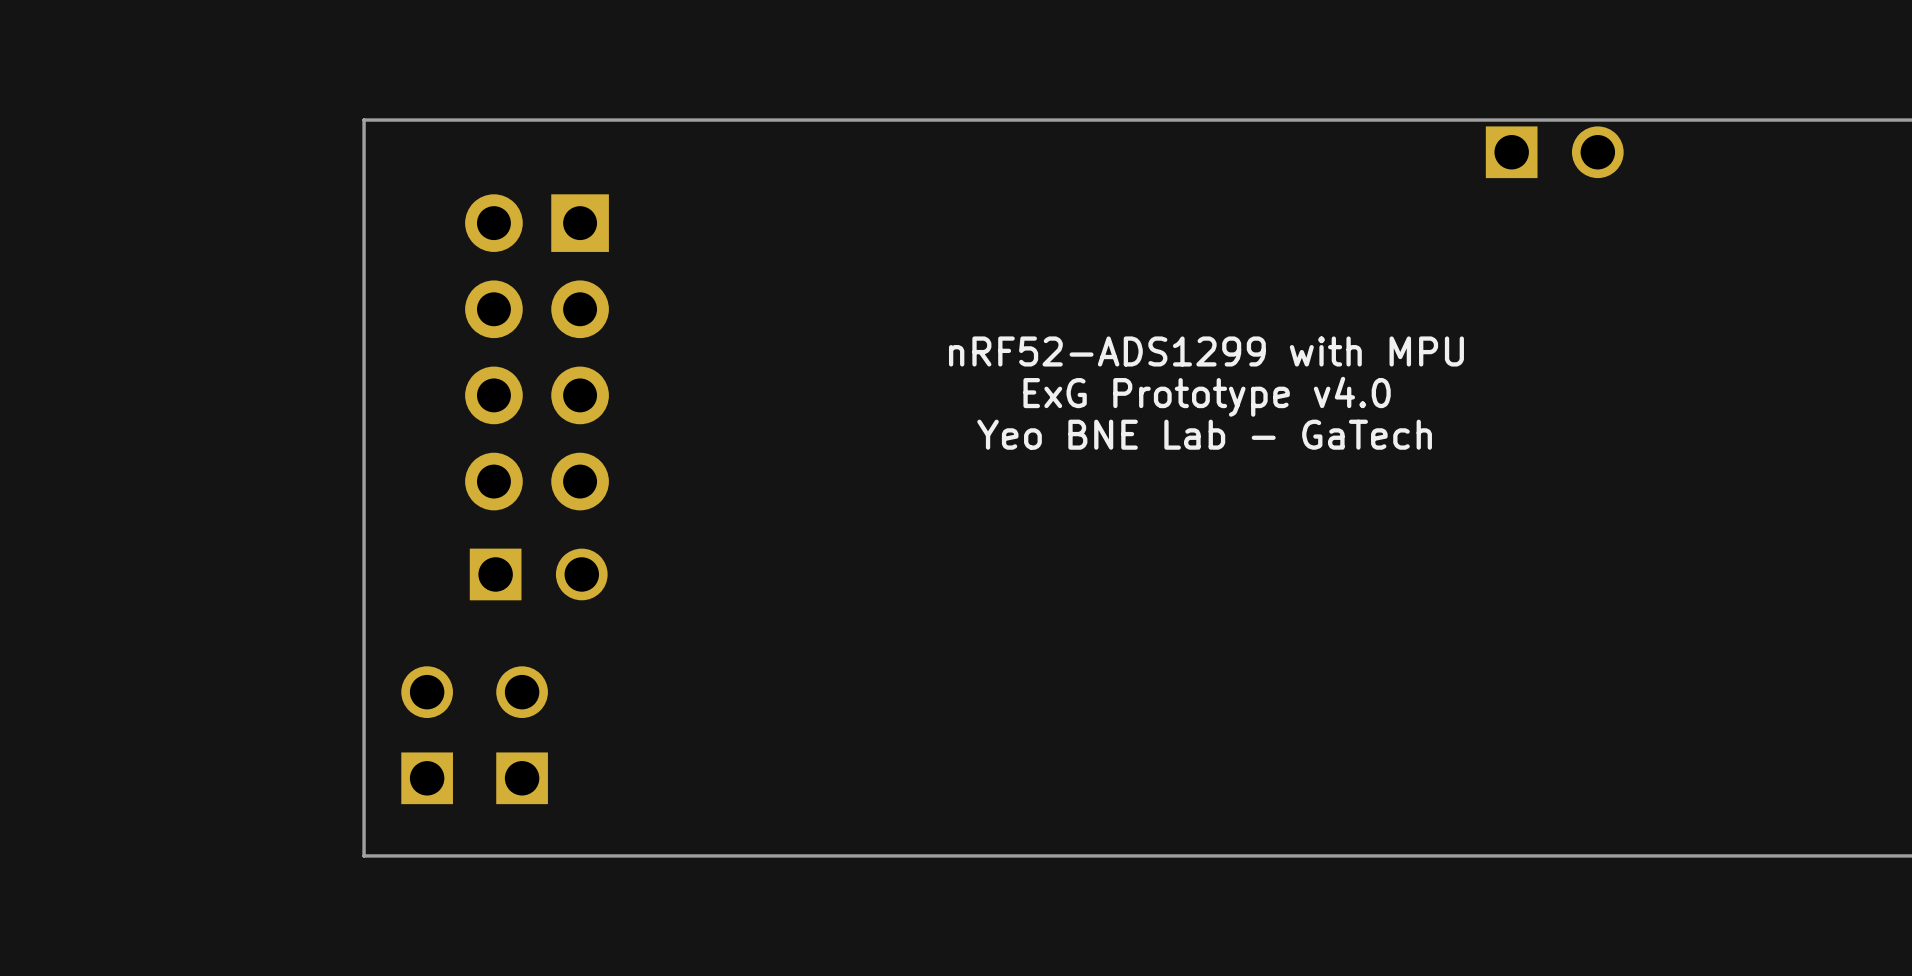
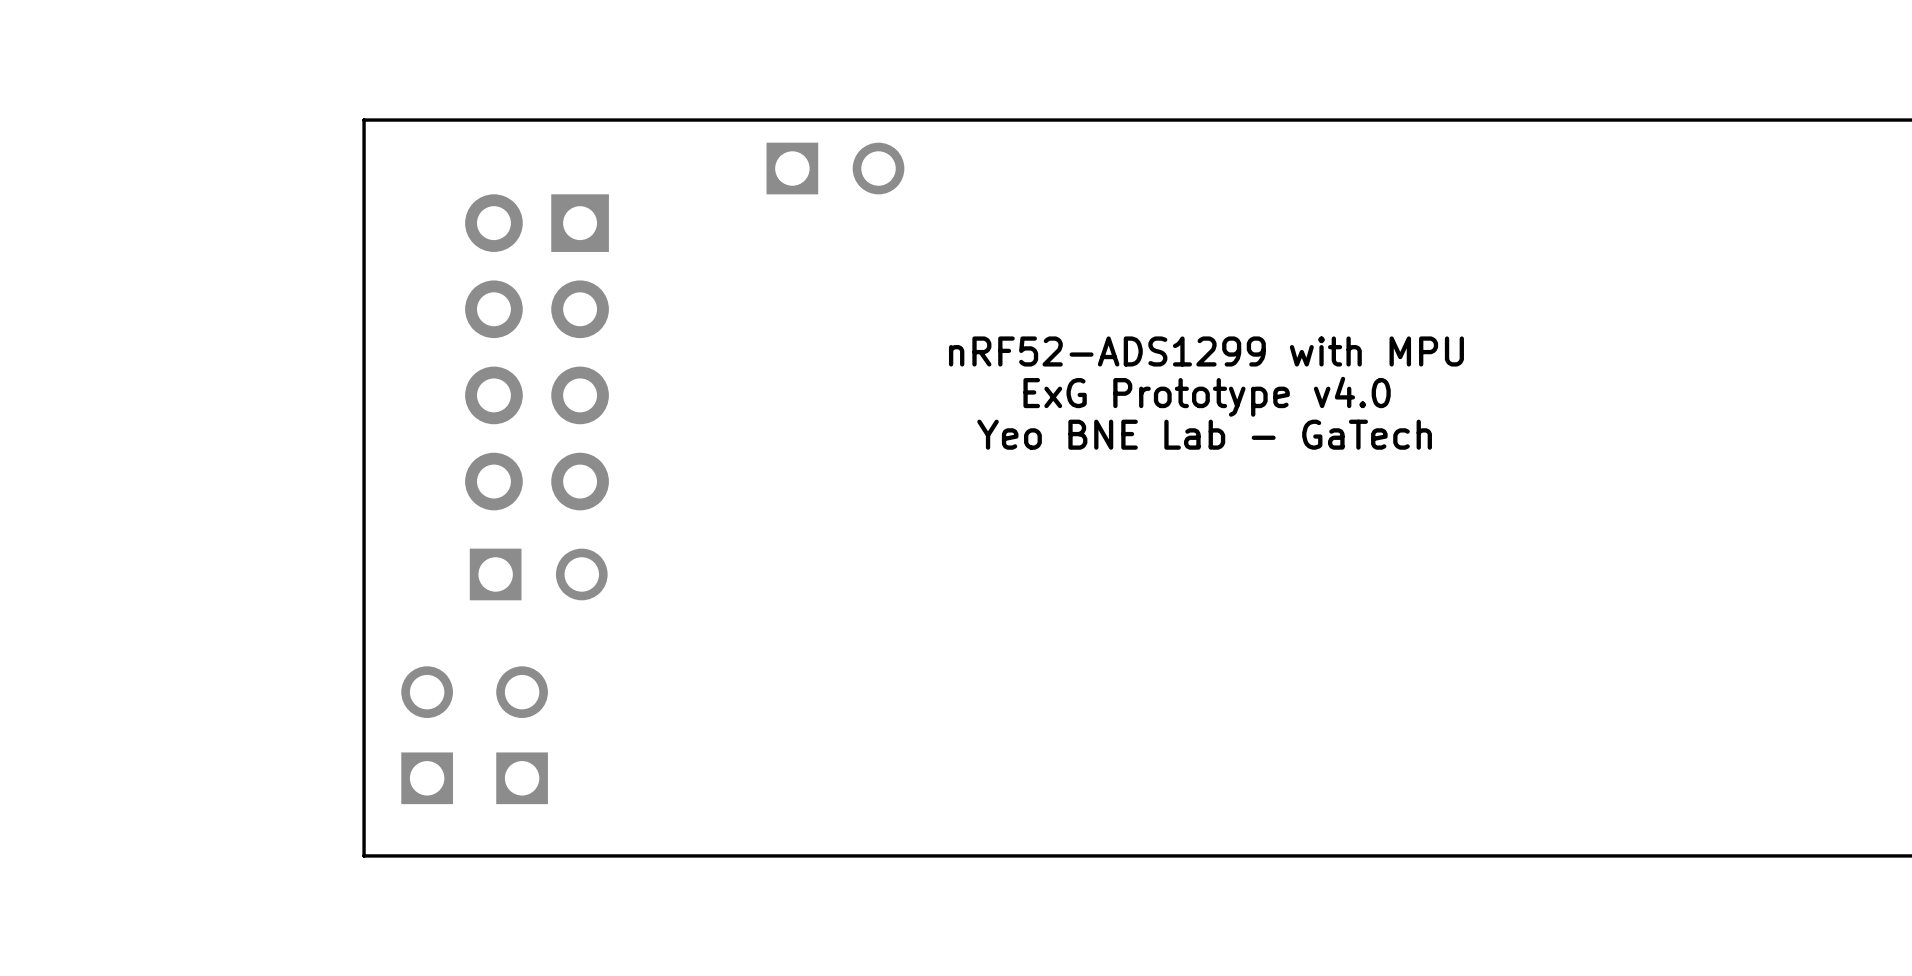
part position: (1554, 152) -> (835, 168)

